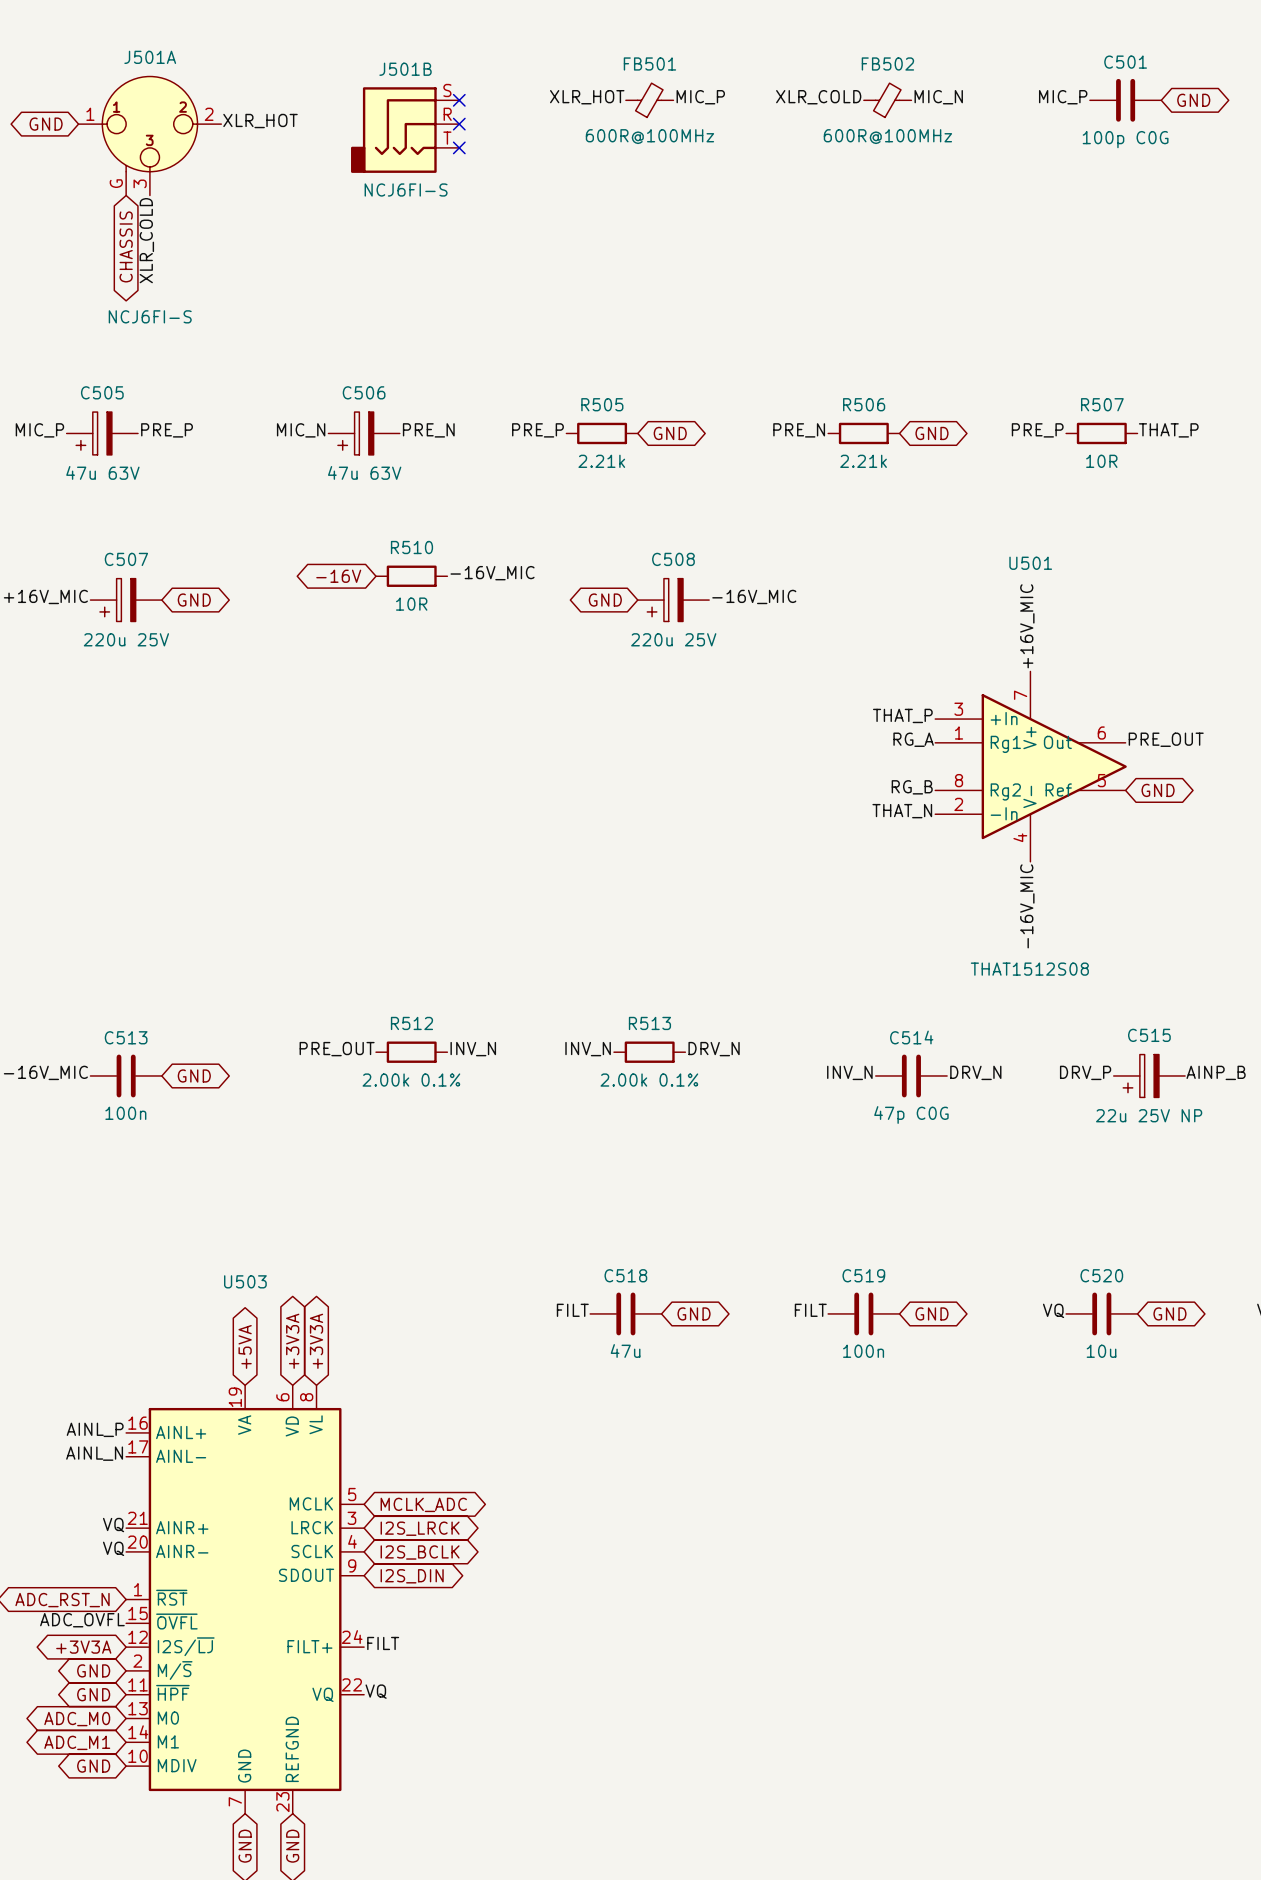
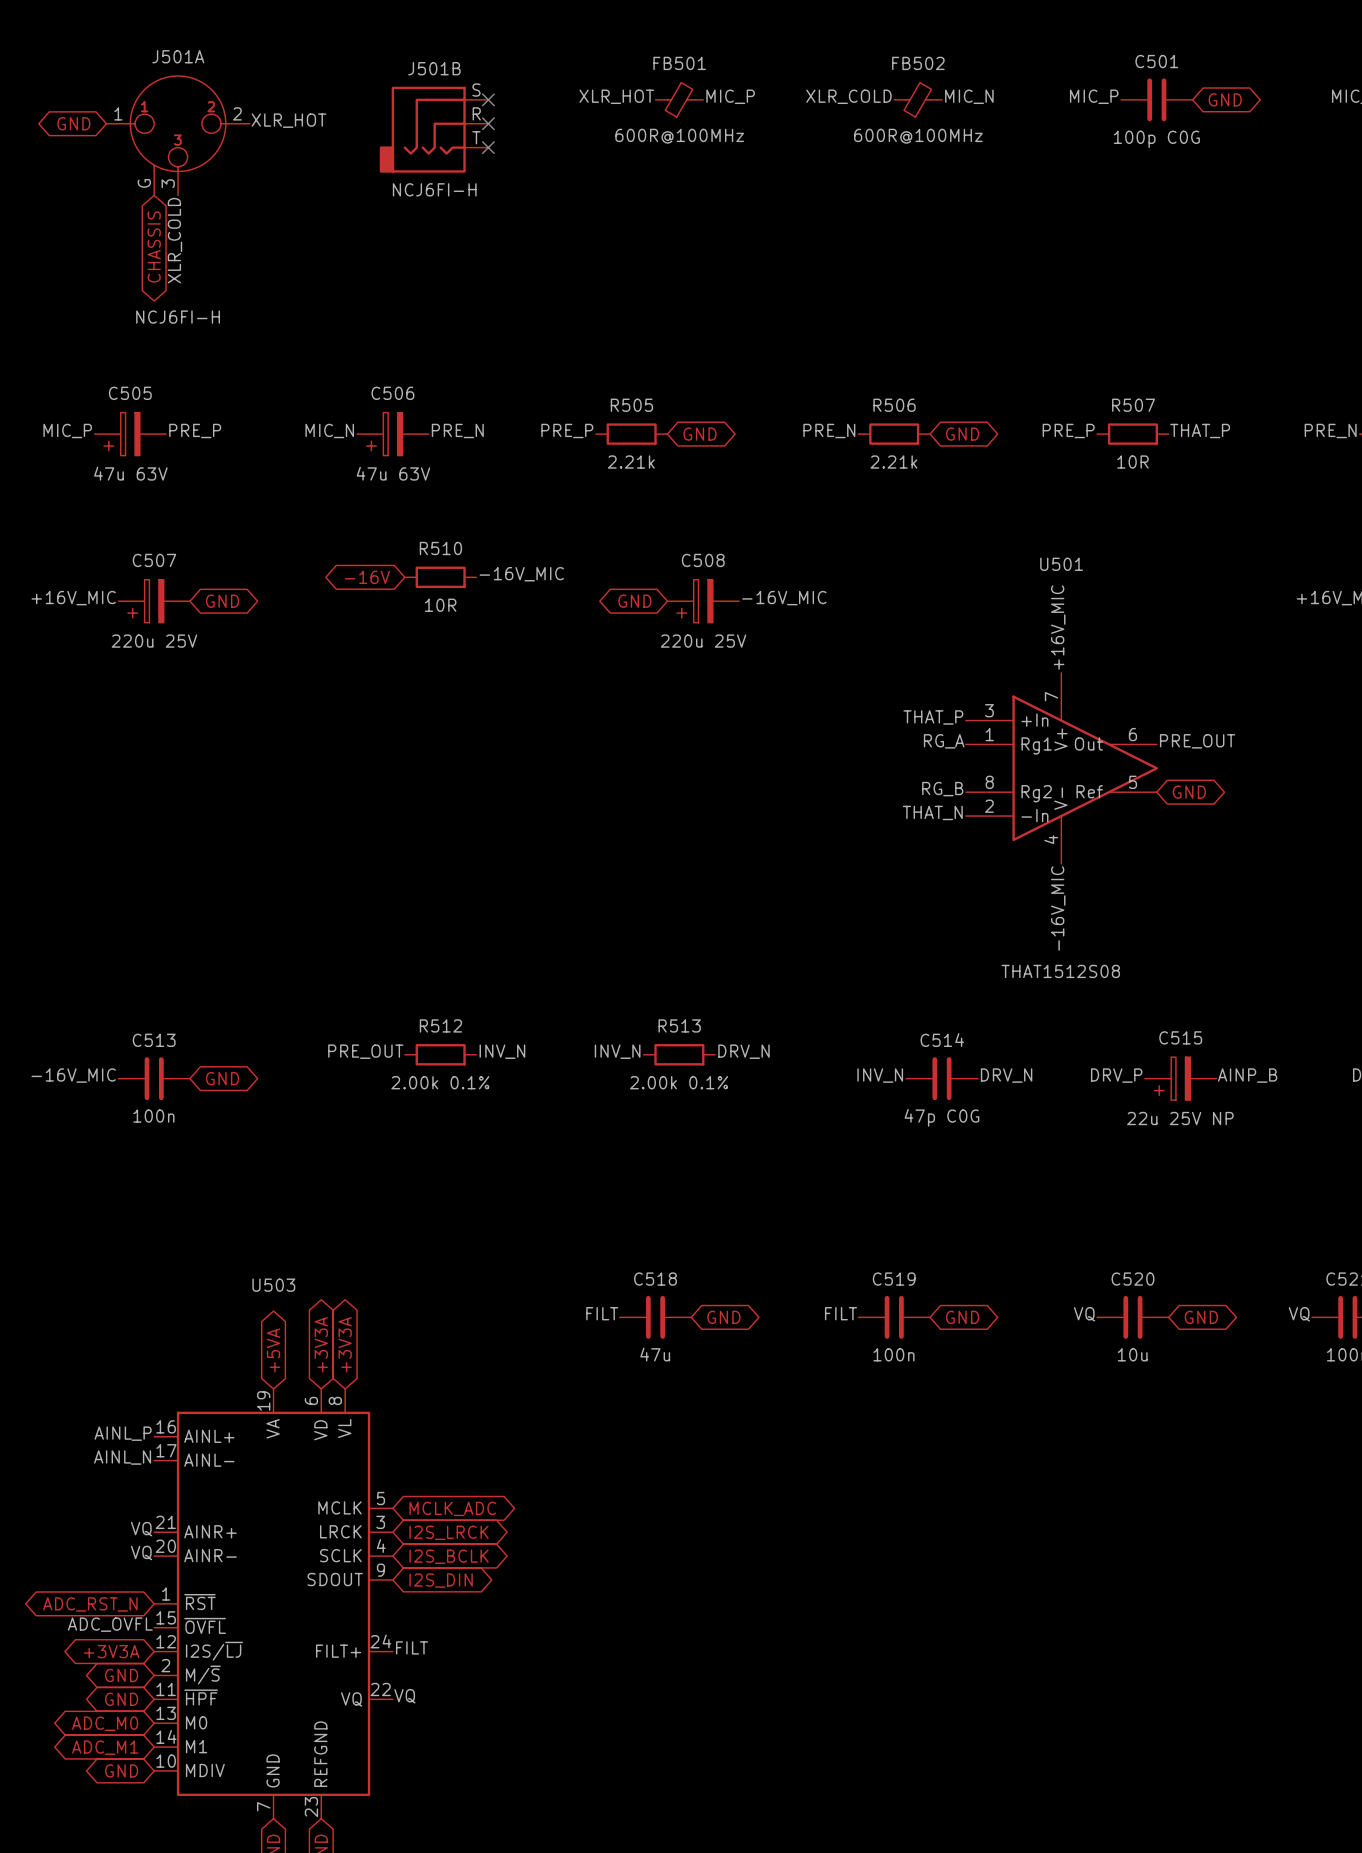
J501B value: NCJ6FI-S (406, 190) -> NCJ6FI-H (434, 189)
J501A value: NCJ6FI-S (150, 316) -> NCJ6FI-H (178, 317)

